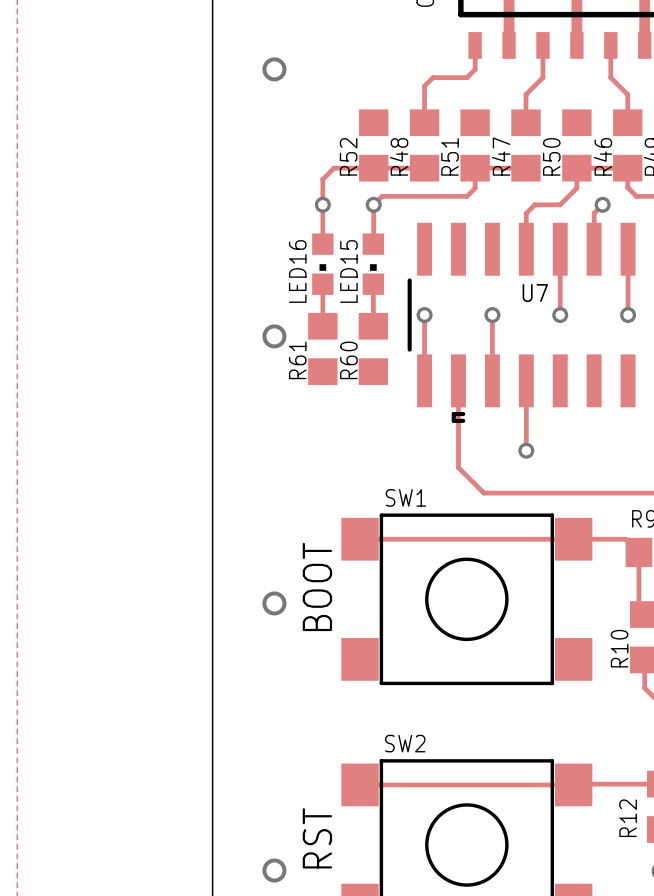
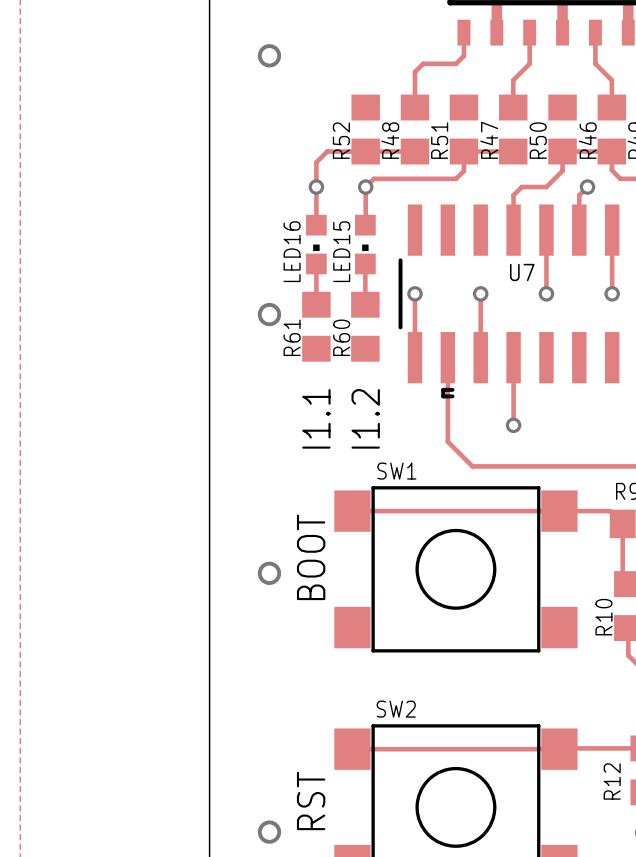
text: none -> I1.1 (316, 418)
text: none -> I1.2 (365, 418)

